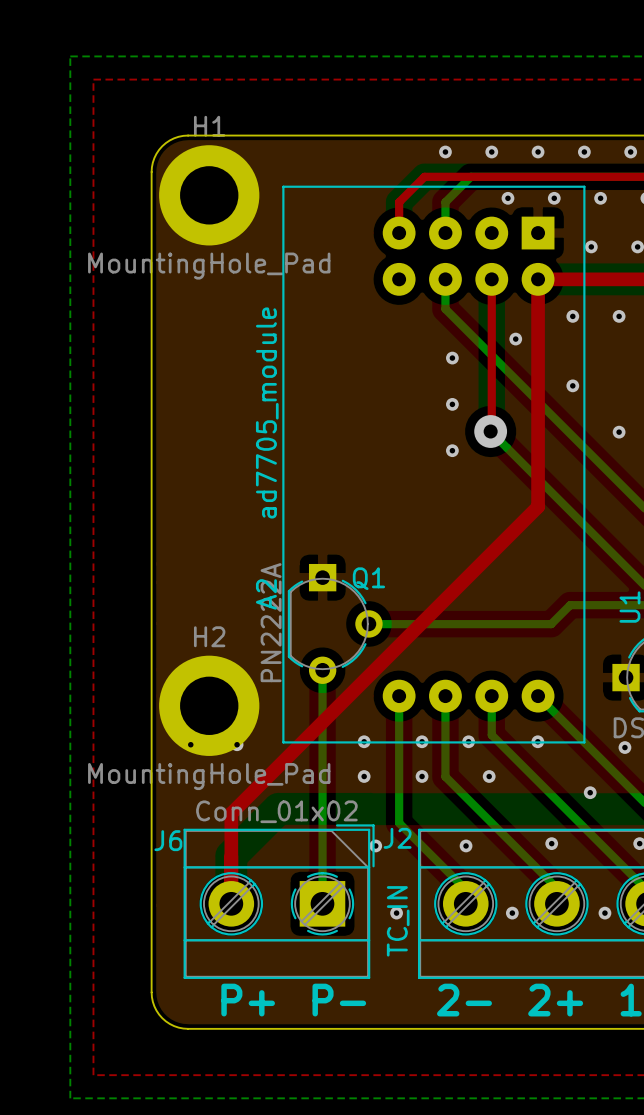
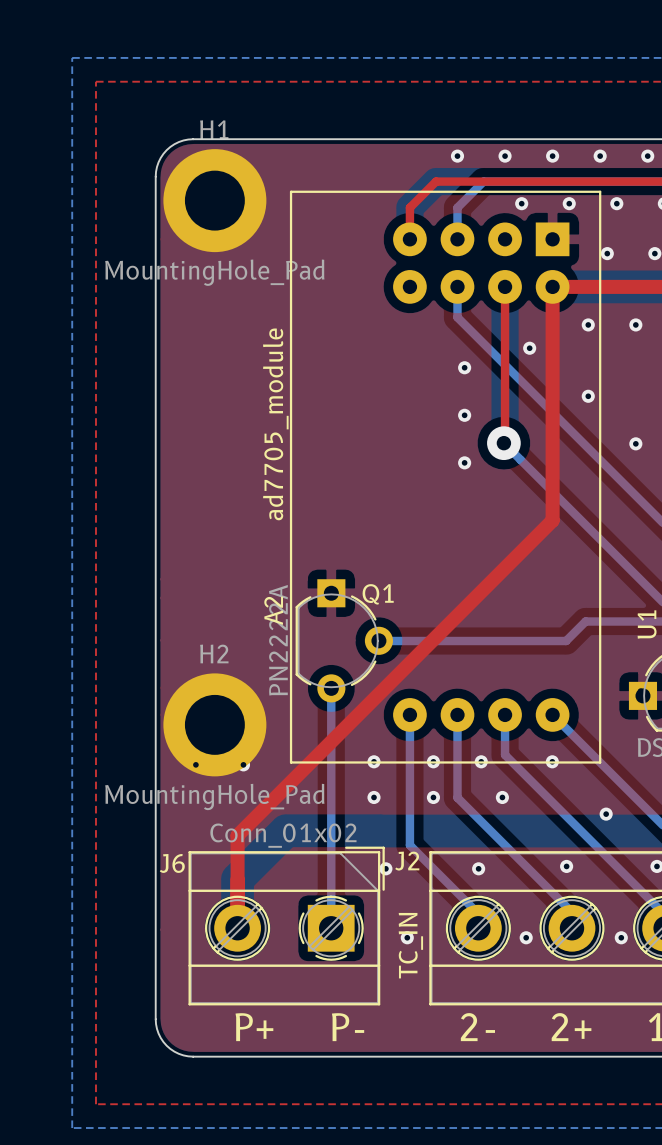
via: (624, 747) -> none

